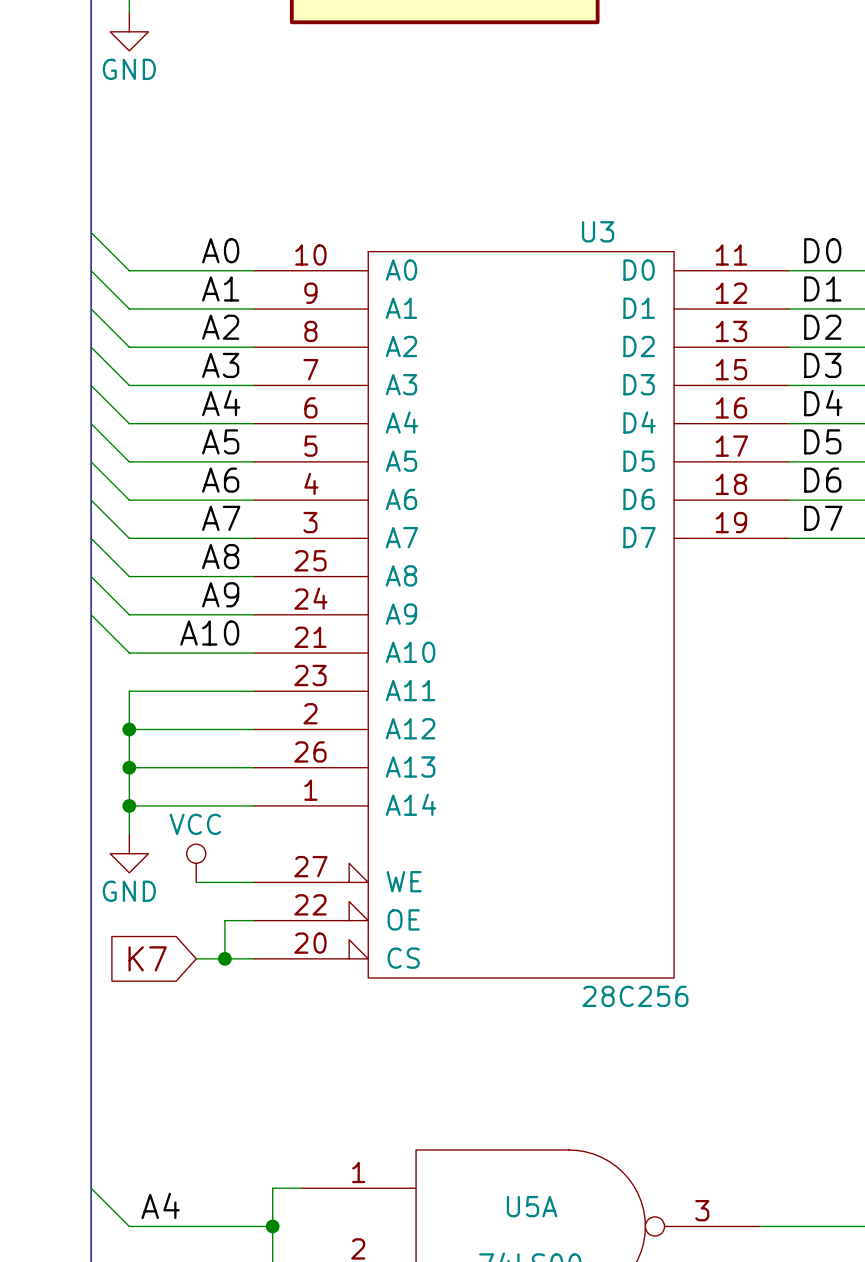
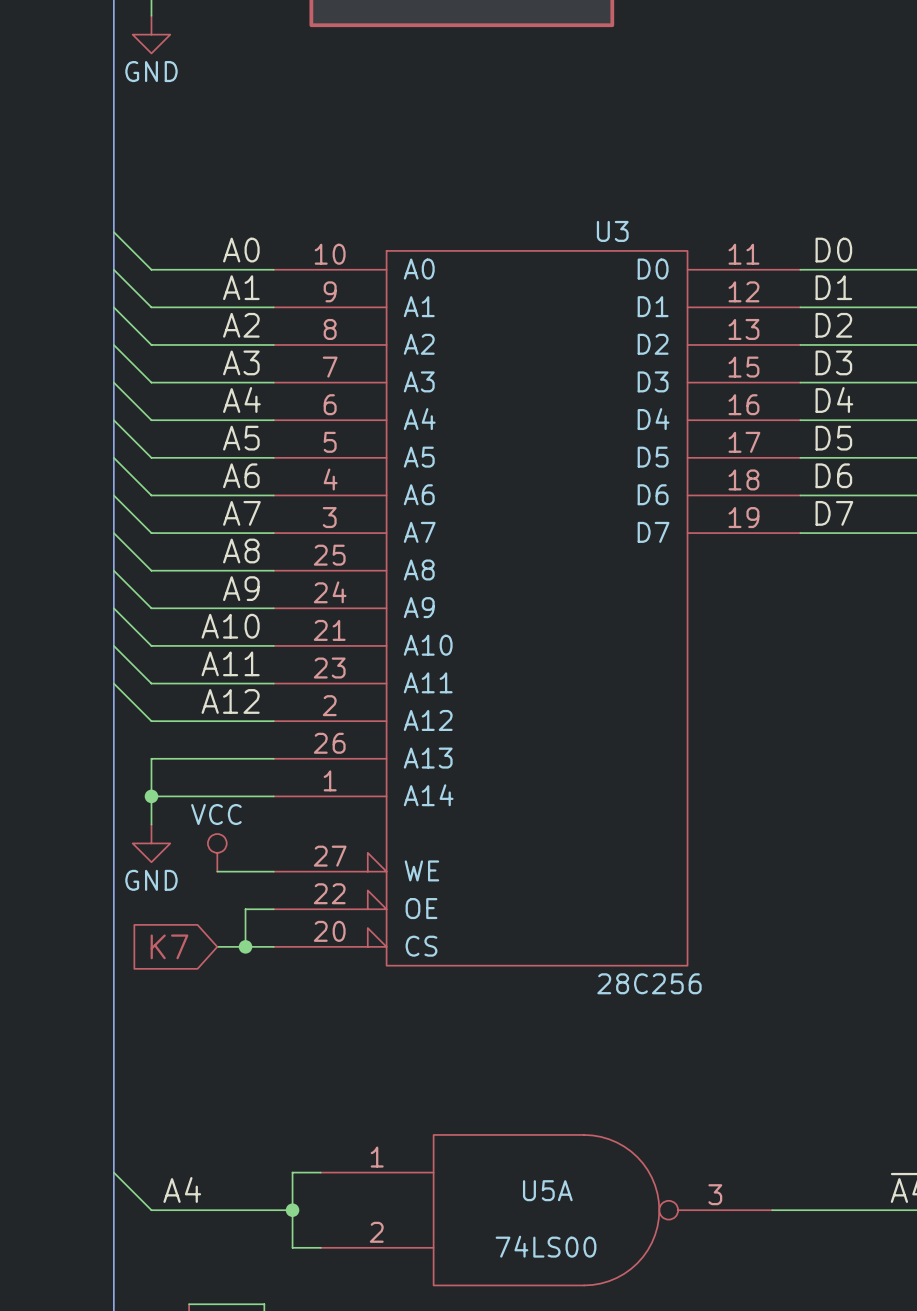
label: none -> A11 (230, 663)
wire: none -> (113, 683) (151, 721)
wire: (129, 691) (129, 767) -> (151, 683) (113, 645)
label: none -> A12 (230, 701)
junction: (129, 729) -> none
junction: (129, 767) -> none

